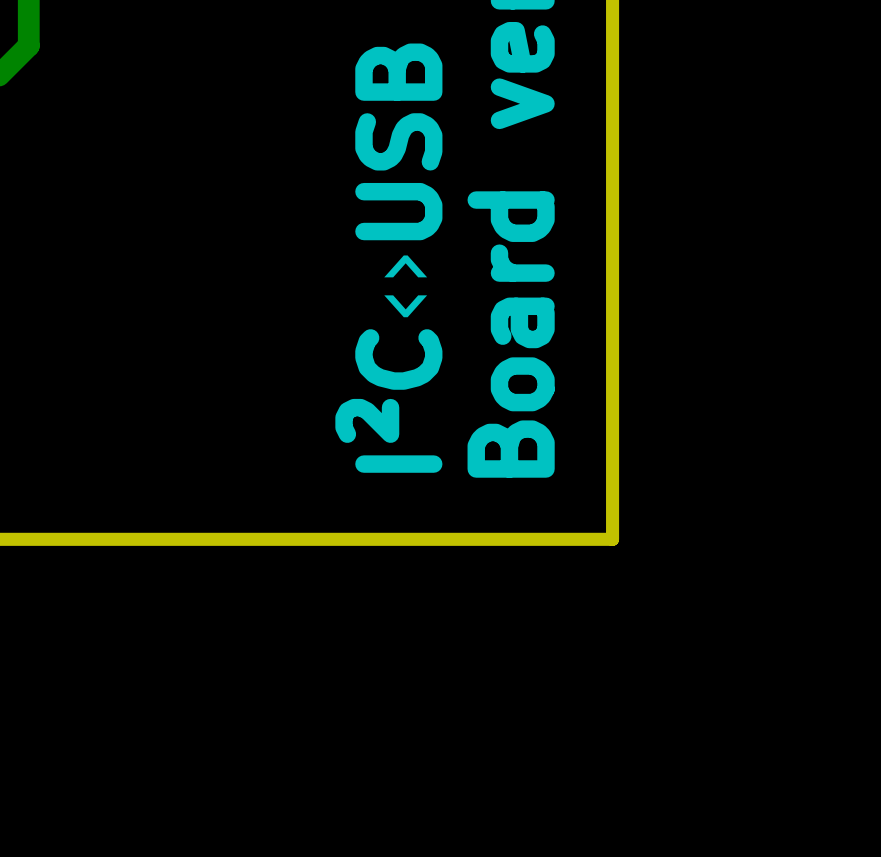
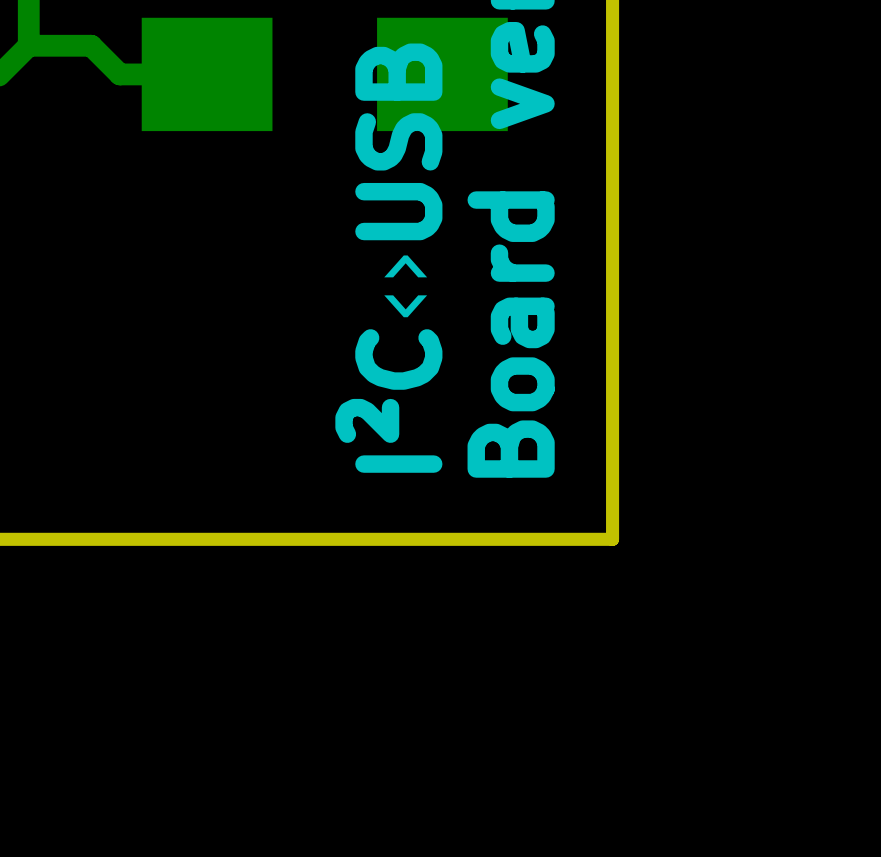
bottom track: none -> (28, 45) (91, 45) (119, 74) (207, 74)
part: none -> (324, 74)

